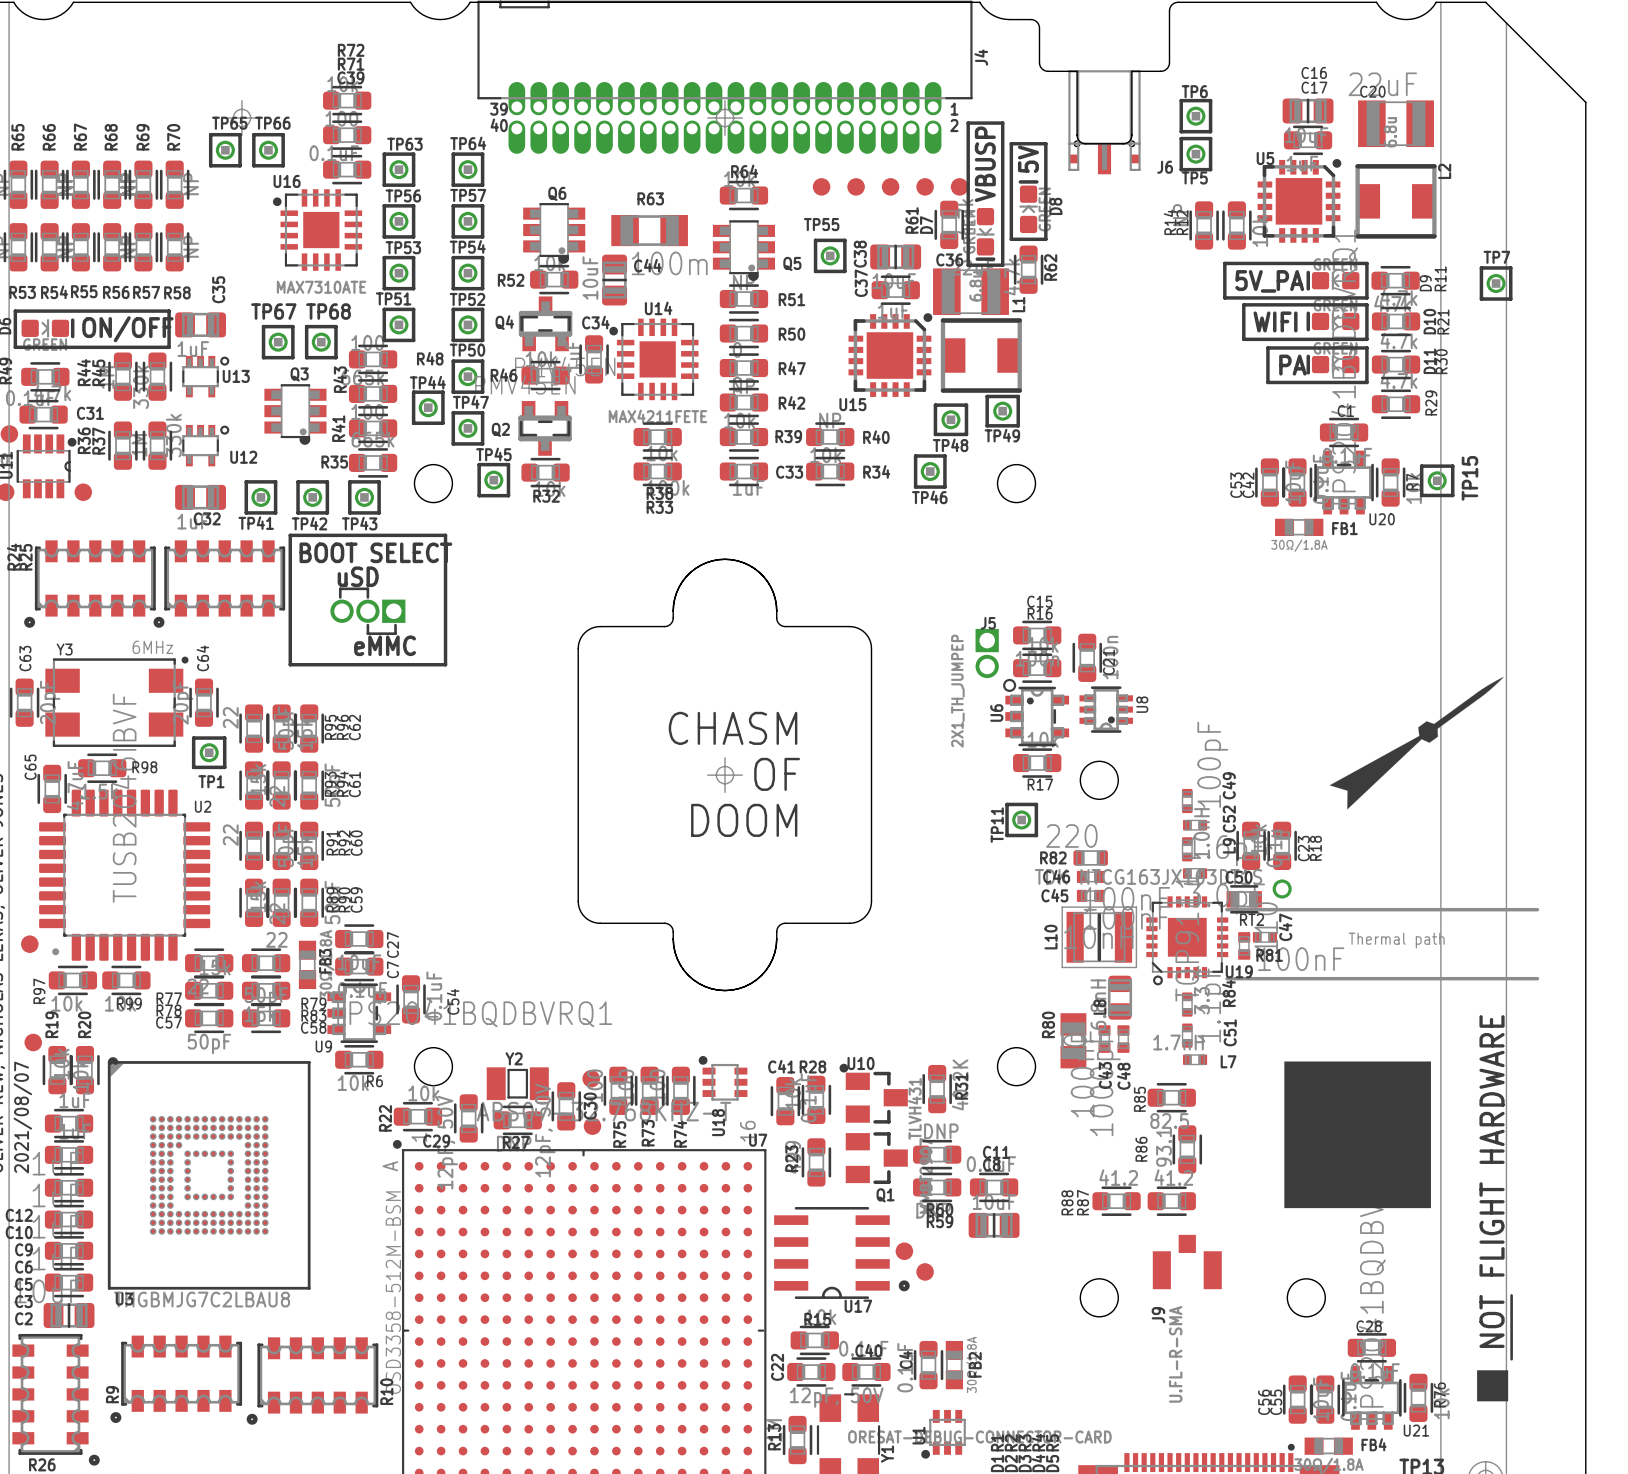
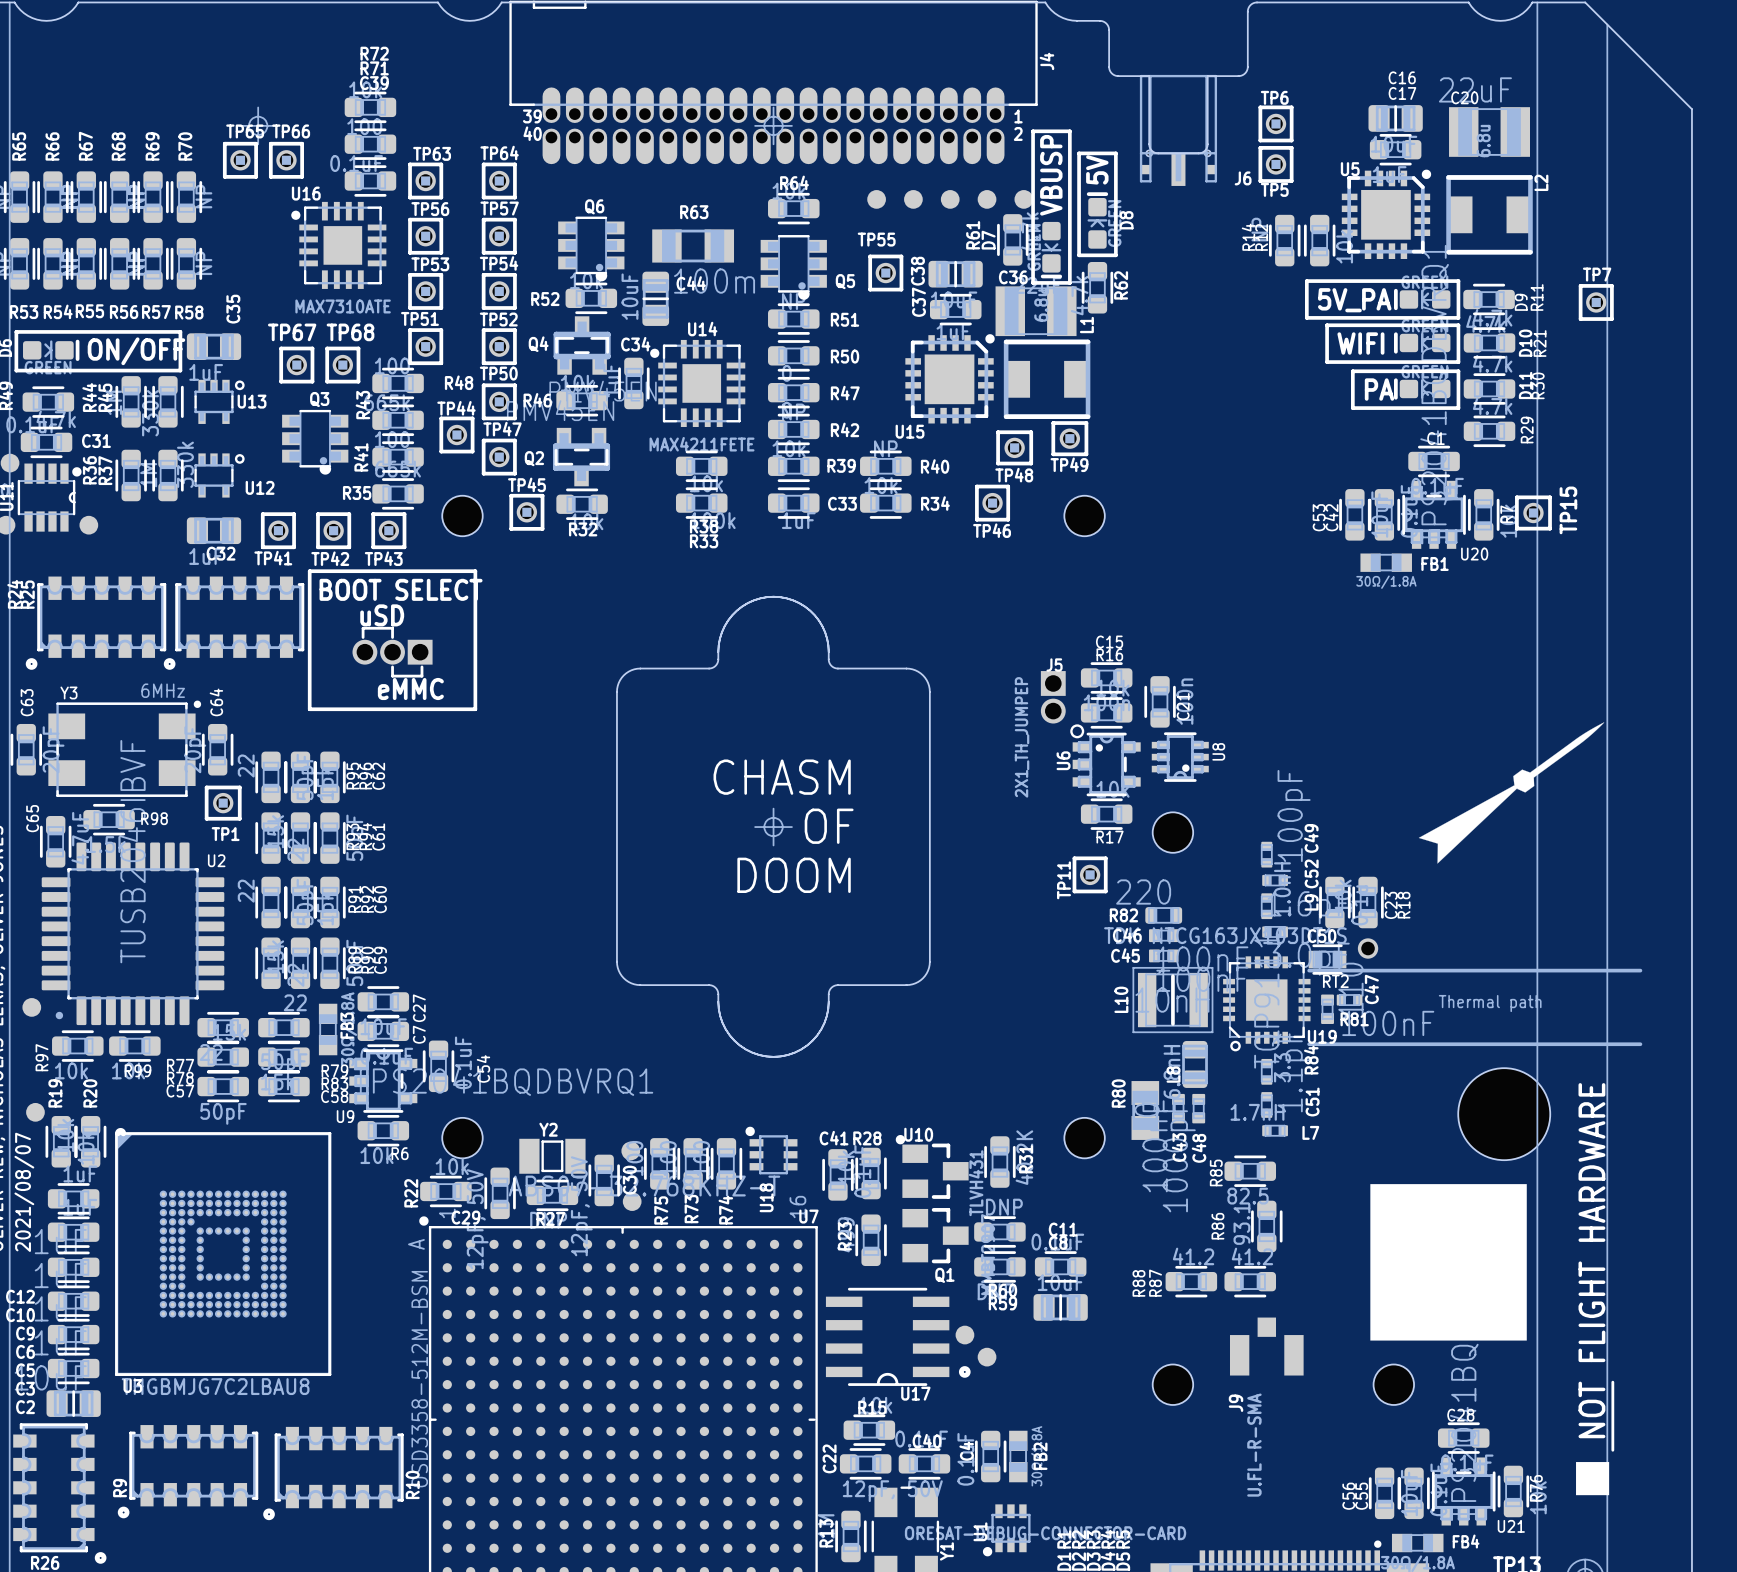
hole: none -> (1504, 1114)
drawing position: (1357, 1134) -> (1448, 1262)

